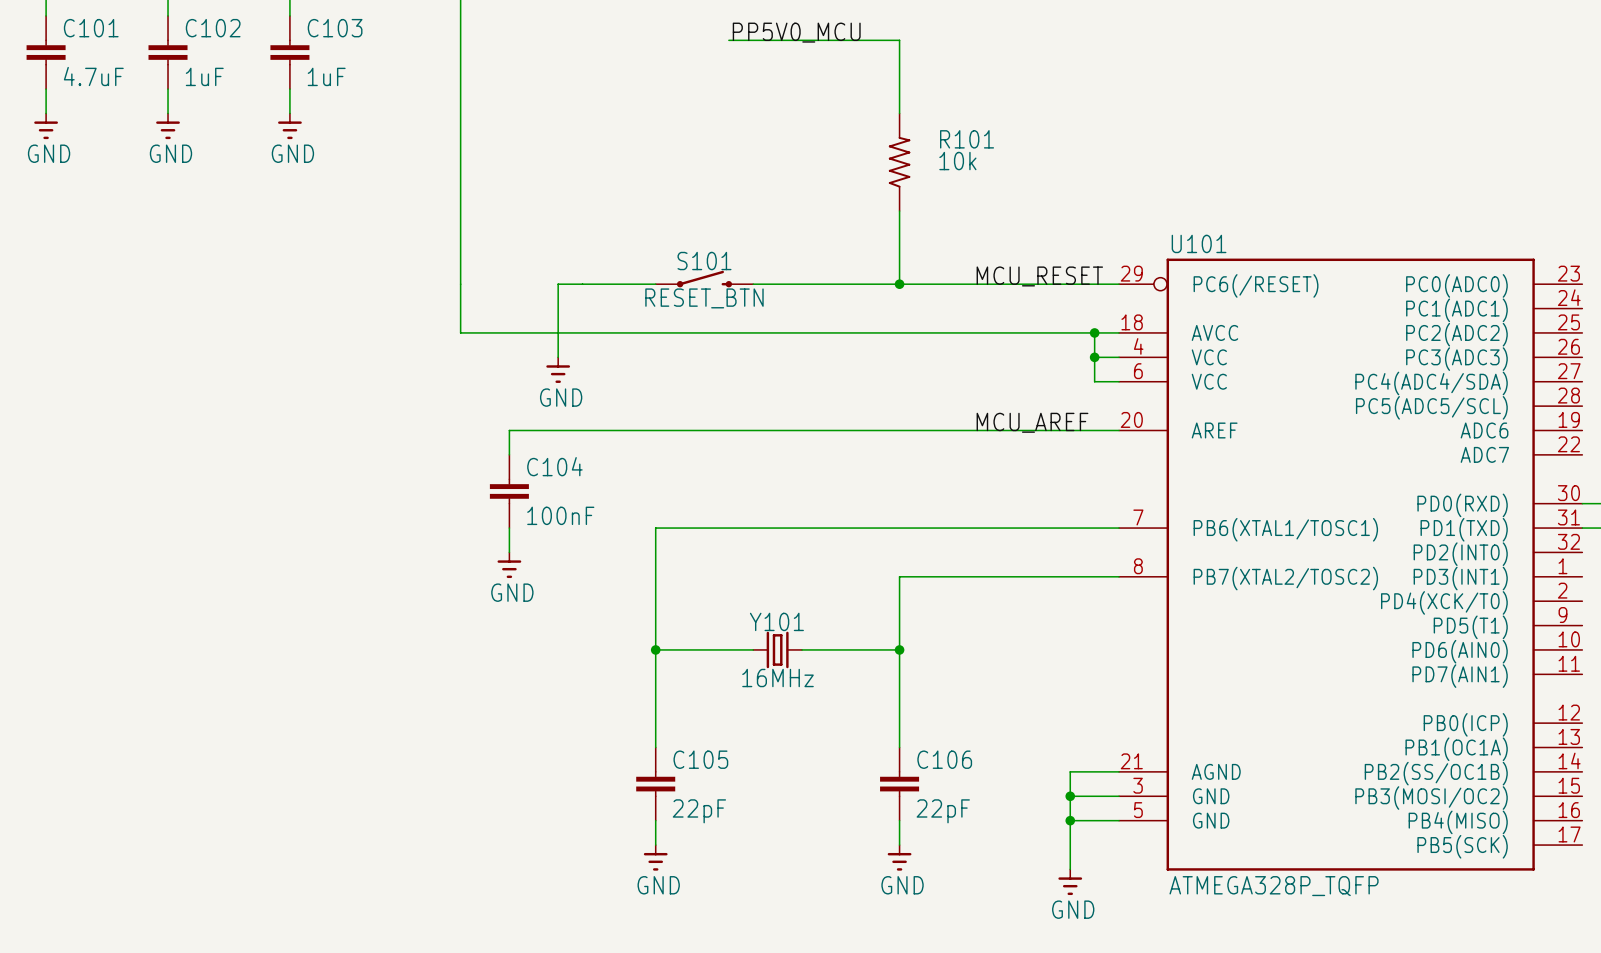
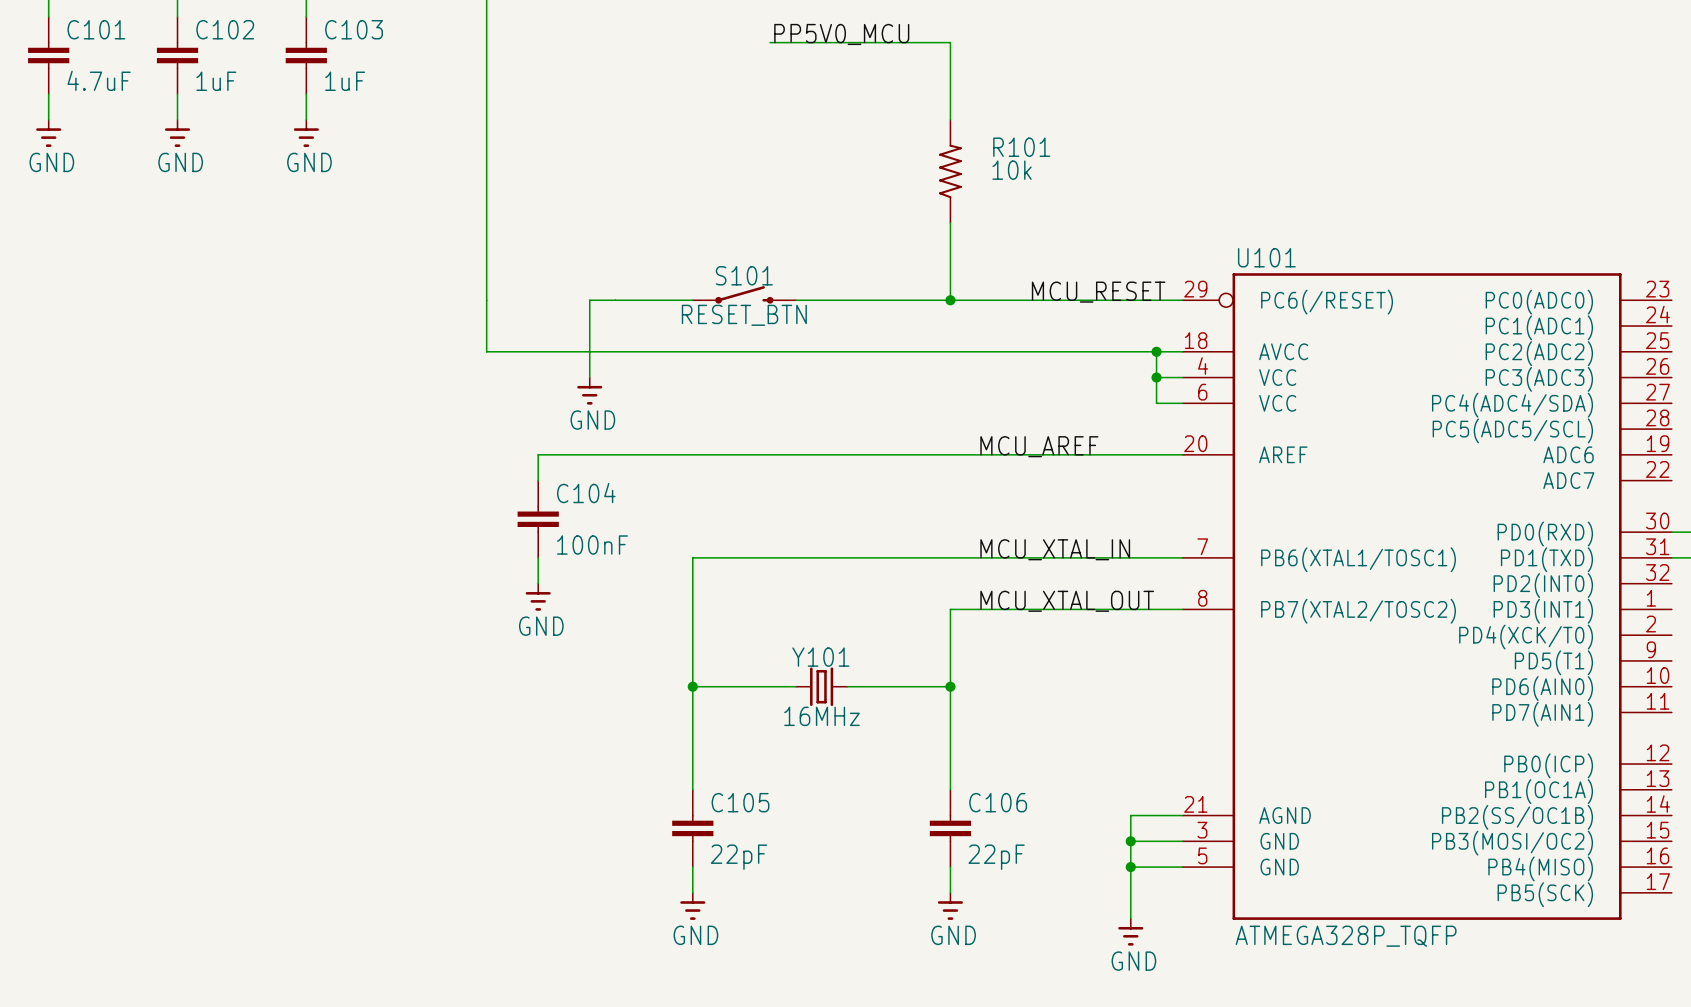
label position: MCU_AREF (1032, 422) -> MCU_AREF (1039, 446)
label: none -> MCU_XTAL_IN (1055, 549)
label: none -> MCU_XTAL_OUT (1067, 601)

